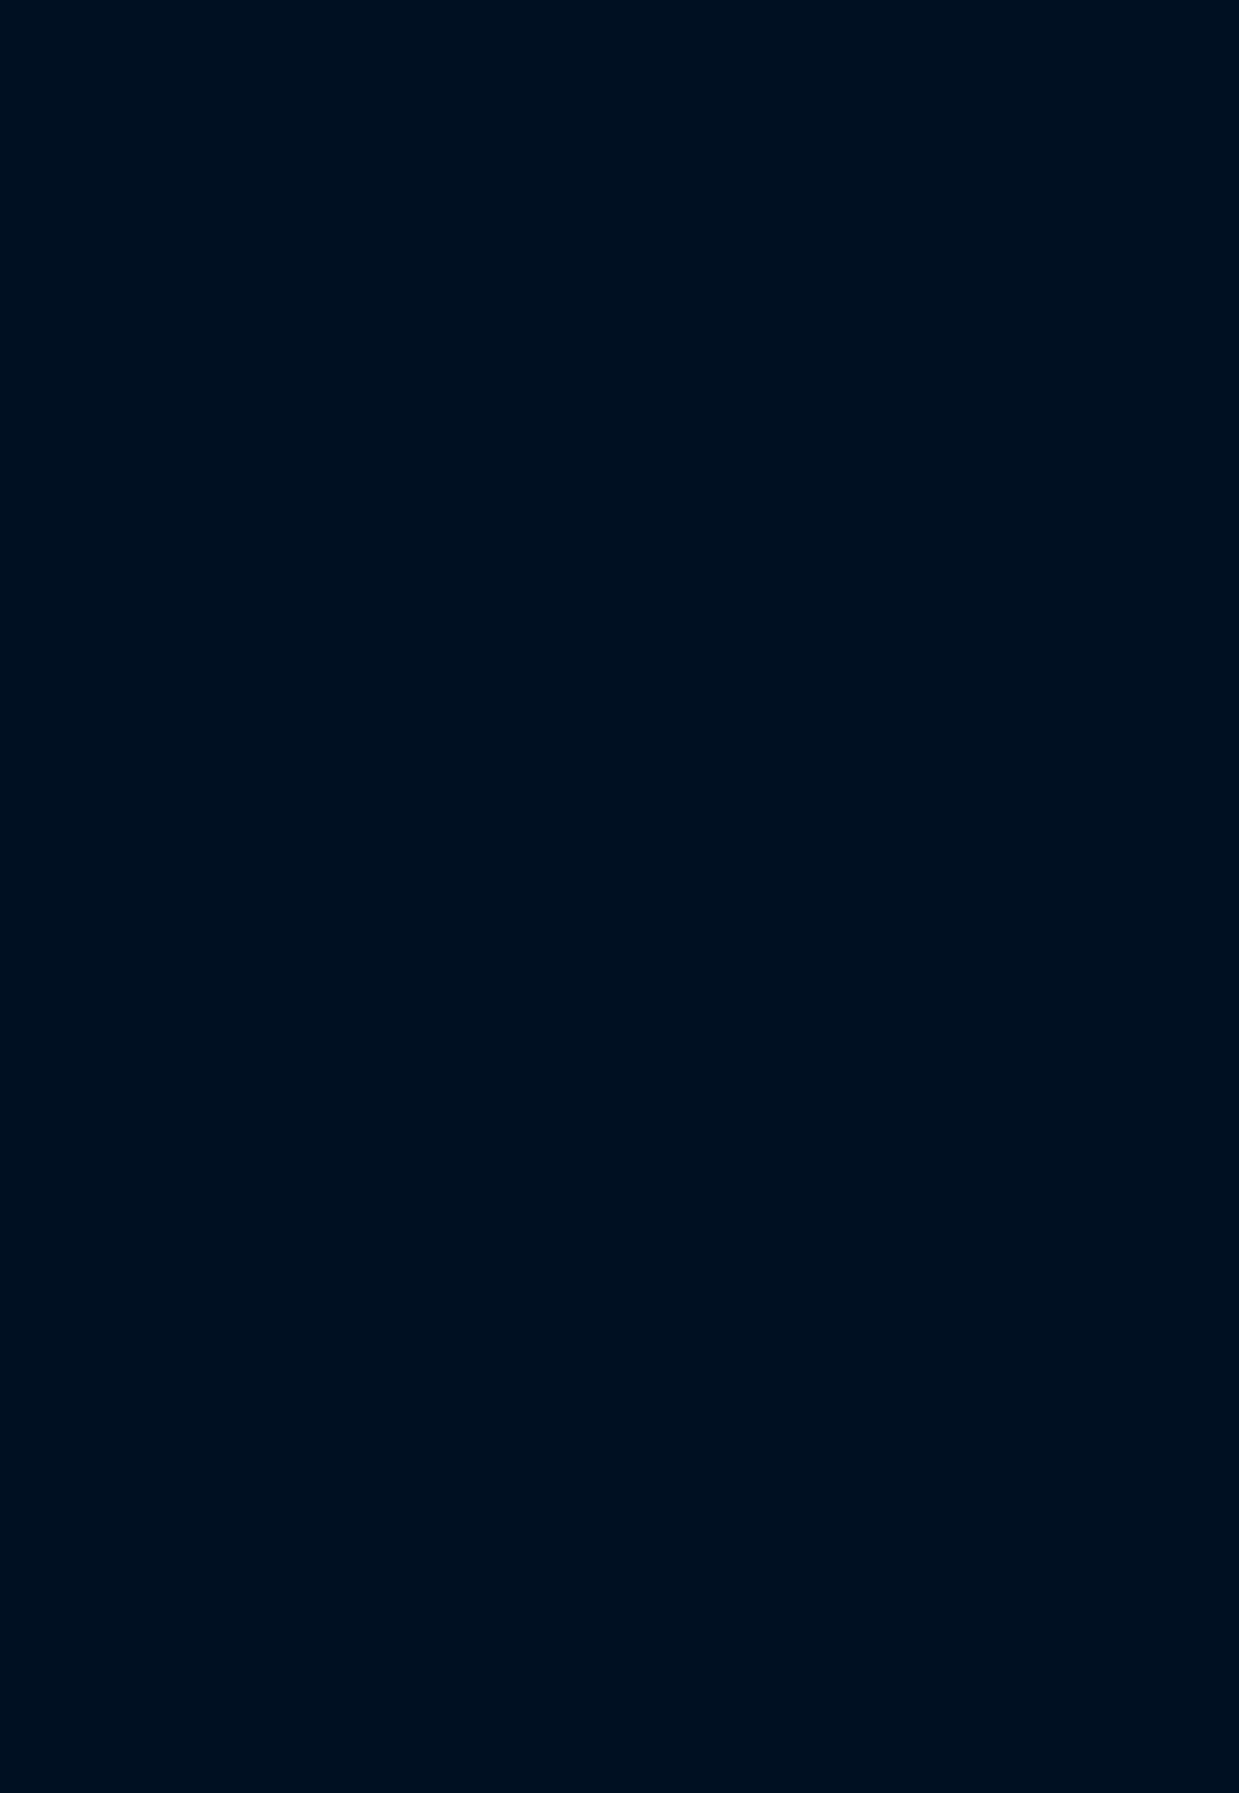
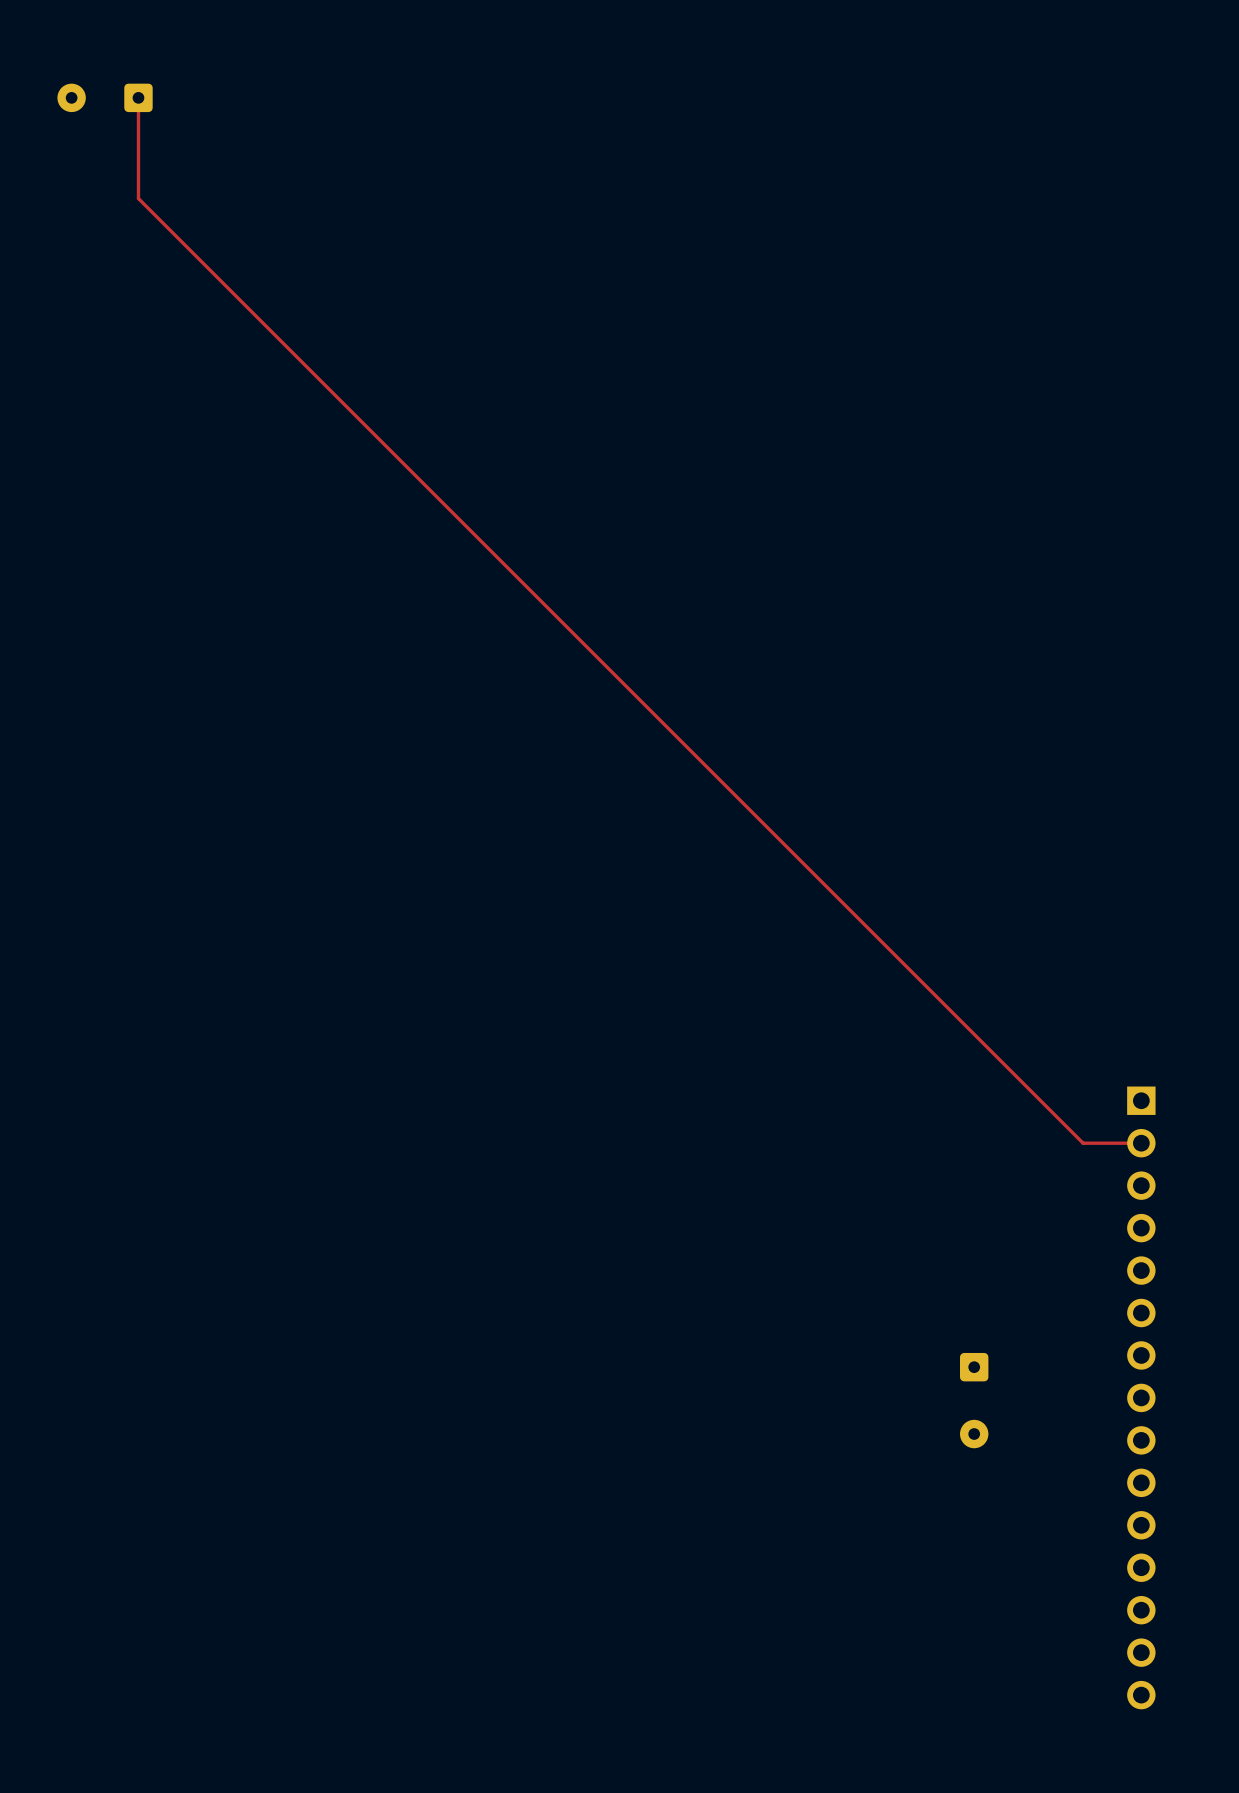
part: none -> (105, 97)
top track: none -> (138, 97) (138, 198) (1083, 1143) (1141, 1143)
part: none -> (1141, 1397)
part: none -> (974, 1400)

